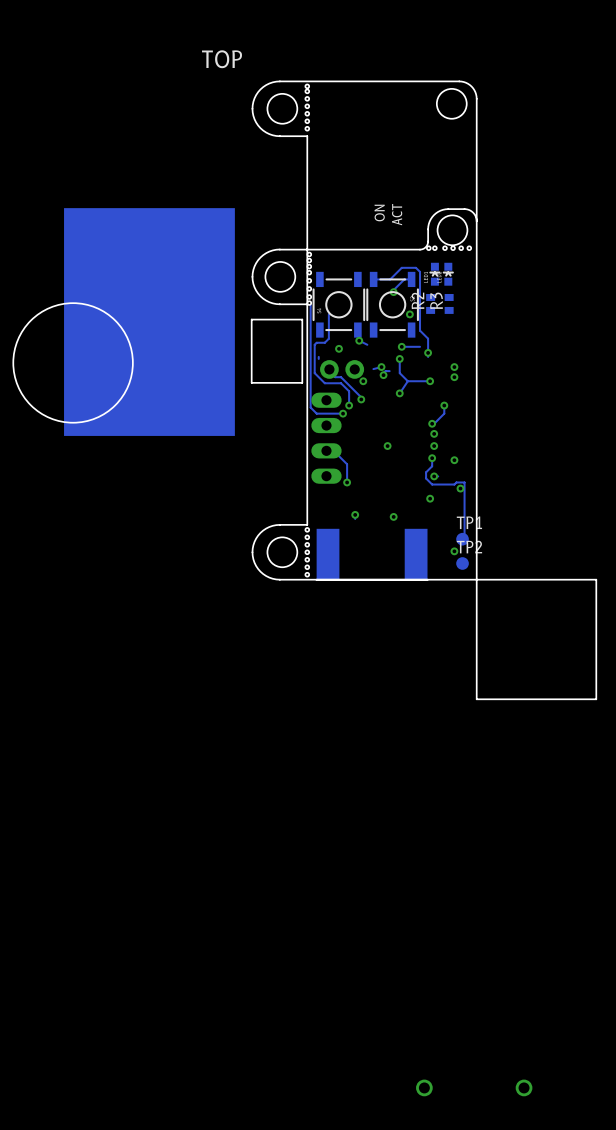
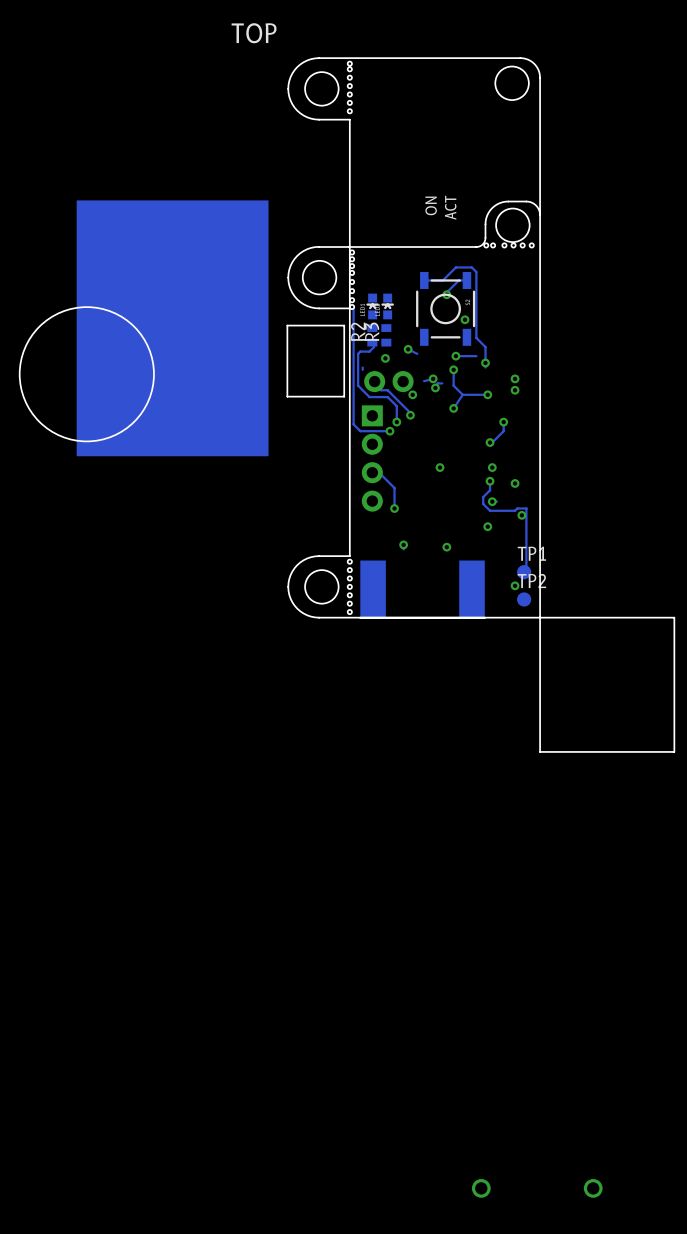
part position: (434, 274) -> (372, 306)
part position: (448, 274) -> (387, 306)
R2 position: (430, 303) -> (372, 335)
R3 position: (449, 303) -> (386, 335)
part: (338, 304) -> none
track: (328, 314) (328, 334) -> none
part footprint: [311, 392, 342, 484] -> [361, 405, 383, 512]
via: (434, 433) -> none

